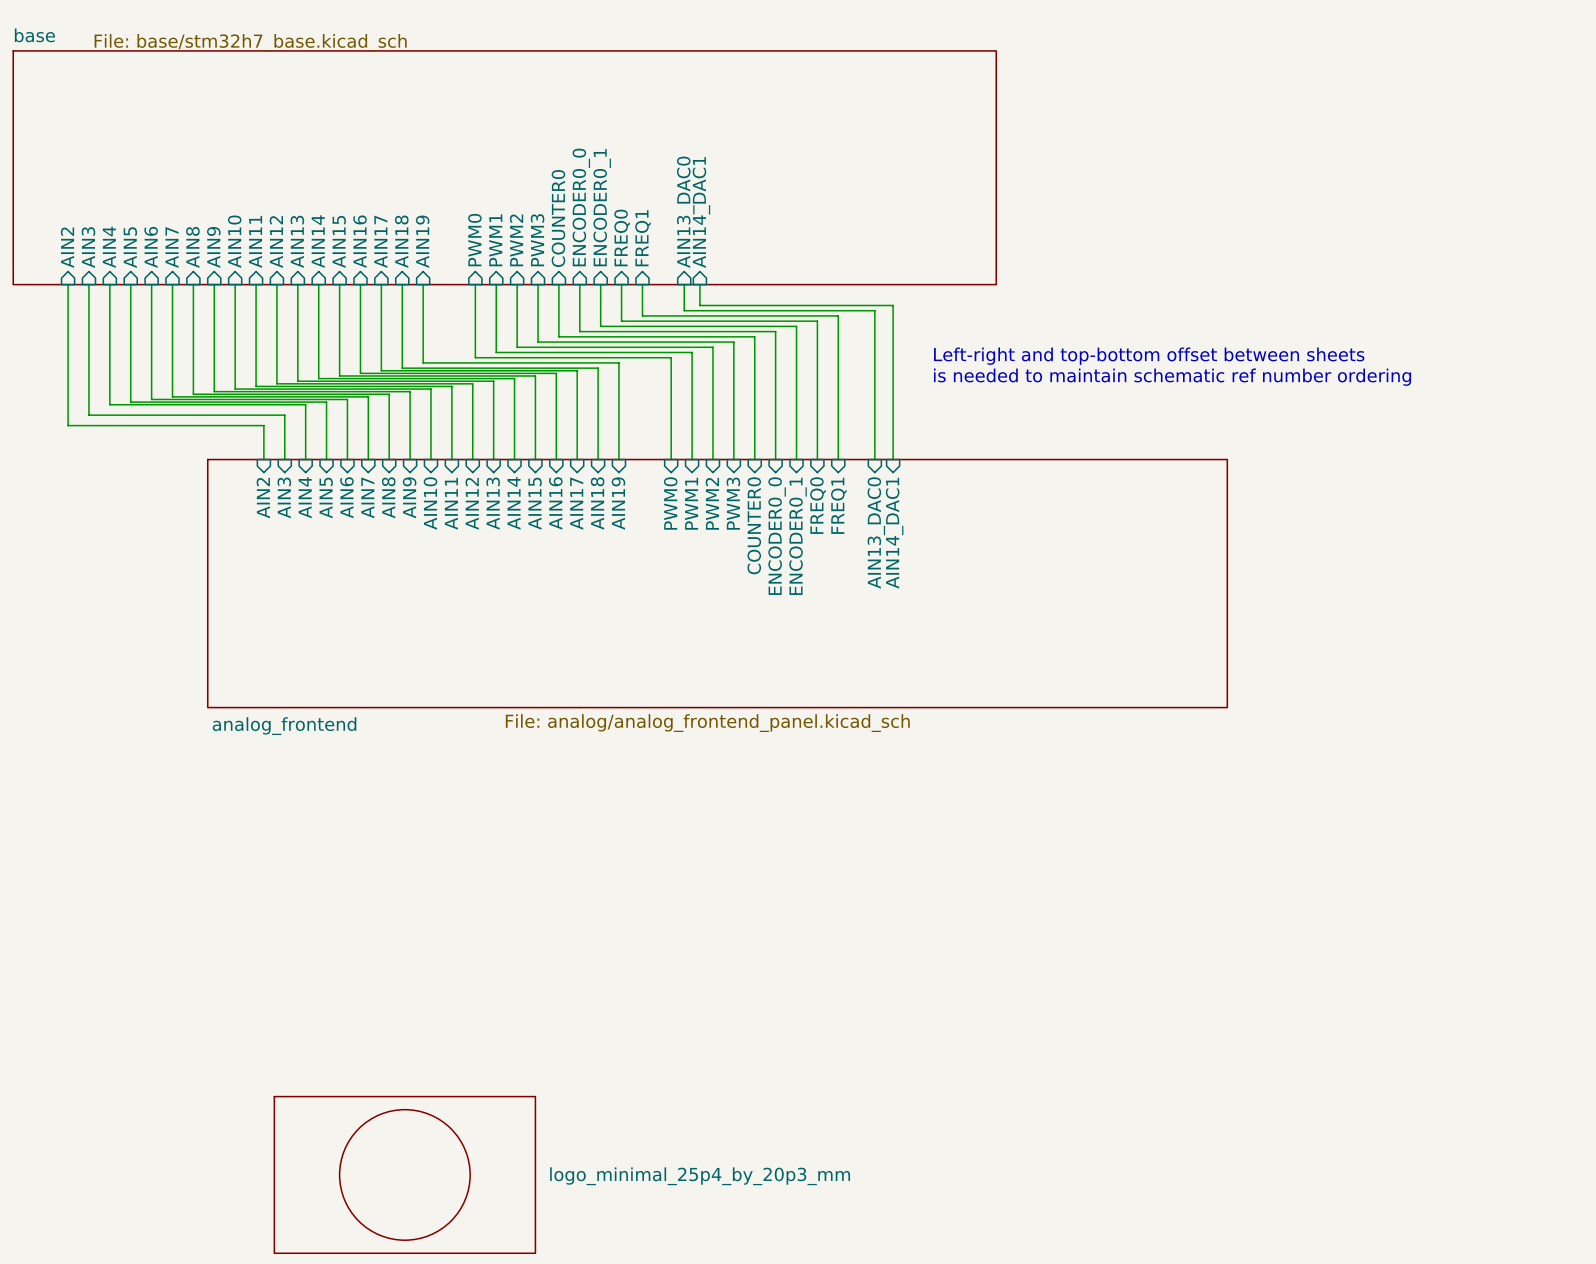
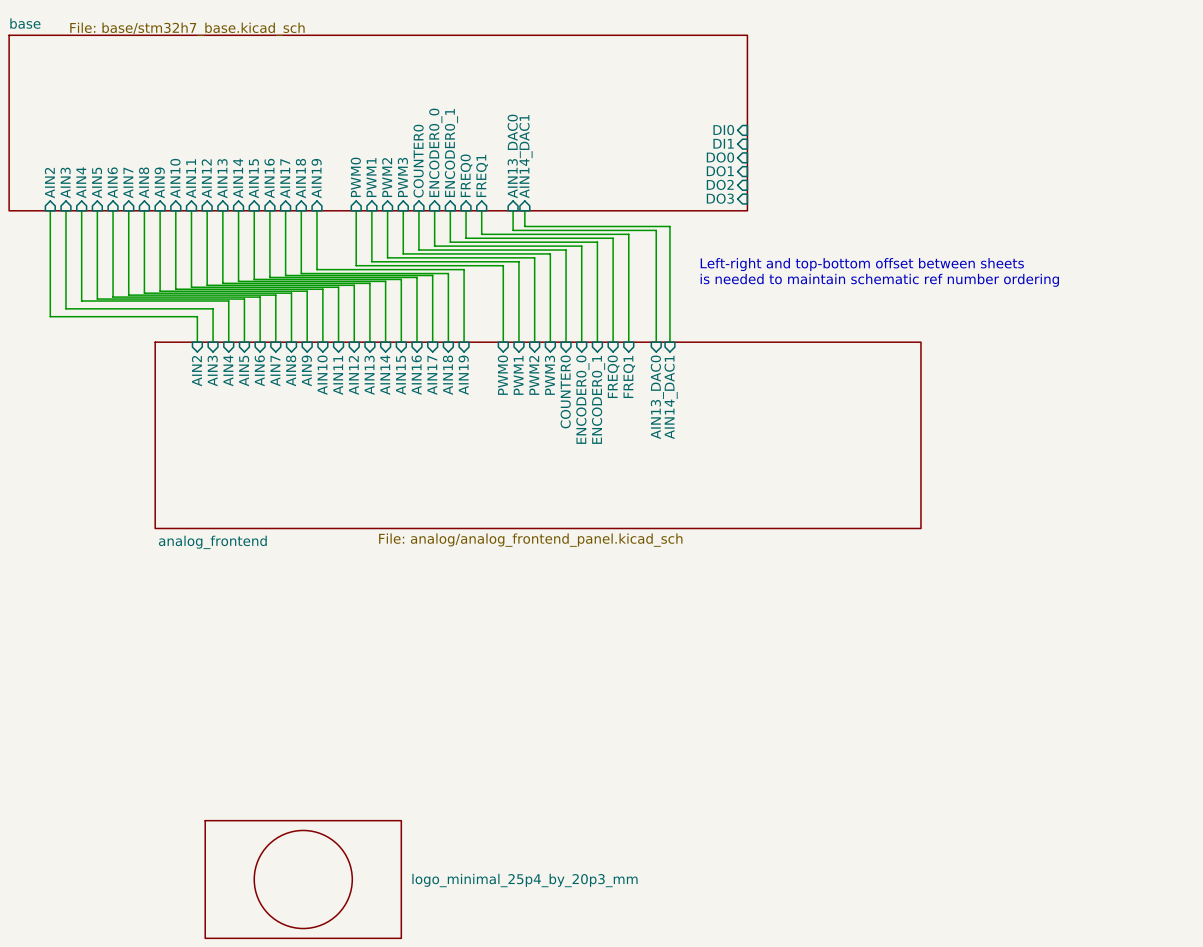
sheet pin: none -> DI0 (723, 130)
sheet pin: none -> DI1 (723, 143)
sheet pin: none -> DO0 (720, 157)
sheet pin: none -> DO1 (720, 171)
sheet pin: none -> DO2 (720, 184)
sheet pin: none -> DO3 (720, 198)

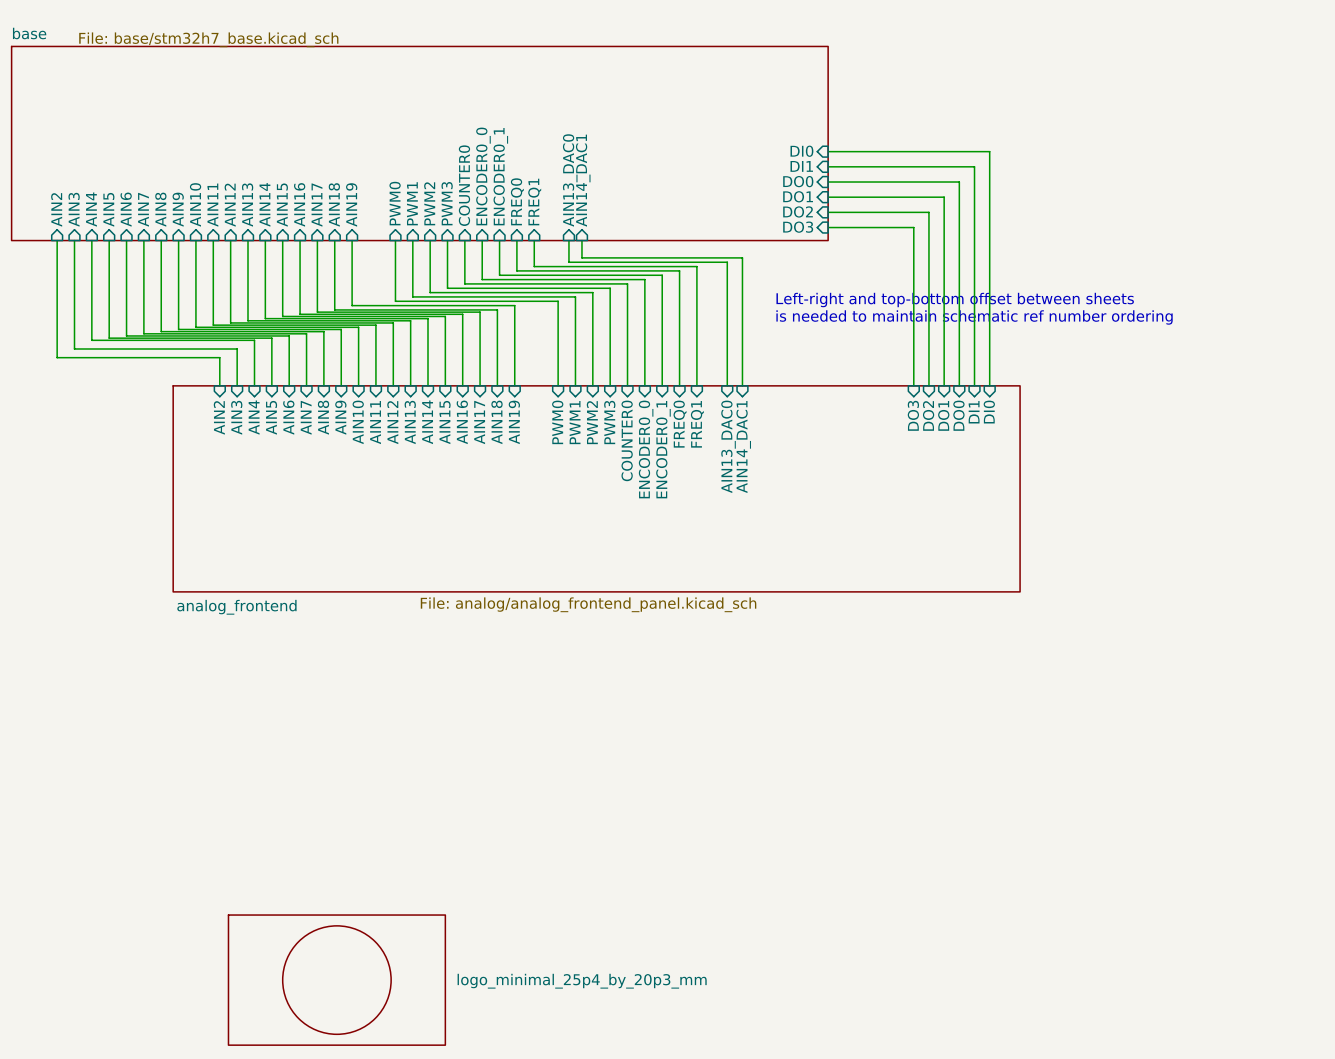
wire: none -> (829, 151) (989, 151) (989, 385)
wire: none -> (829, 166) (974, 166) (974, 385)
wire: none -> (829, 182) (959, 182) (959, 385)
wire: none -> (829, 197) (944, 197) (944, 385)
wire: none -> (829, 212) (928, 212) (928, 385)
wire: none -> (829, 227) (913, 227) (913, 385)
sheet pin: none -> DI0 (989, 412)
sheet pin: none -> DI1 (974, 412)
sheet pin: none -> DO3 (913, 415)
sheet pin: none -> DO2 (928, 415)
sheet pin: none -> DO1 (943, 415)
sheet pin: none -> DO0 (958, 415)

